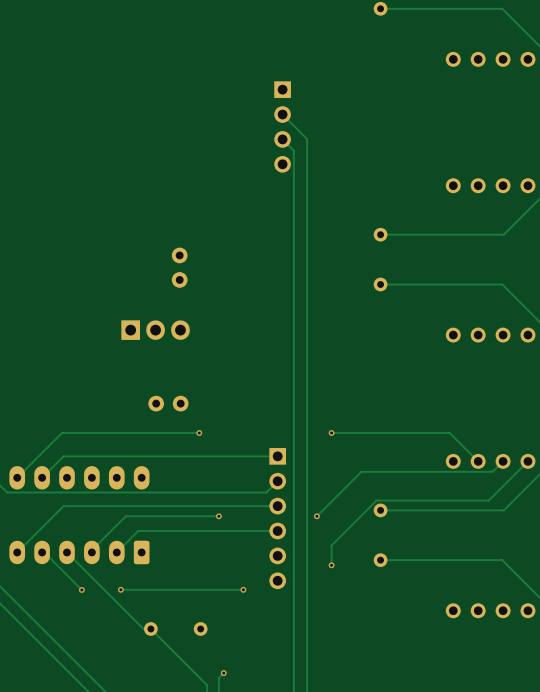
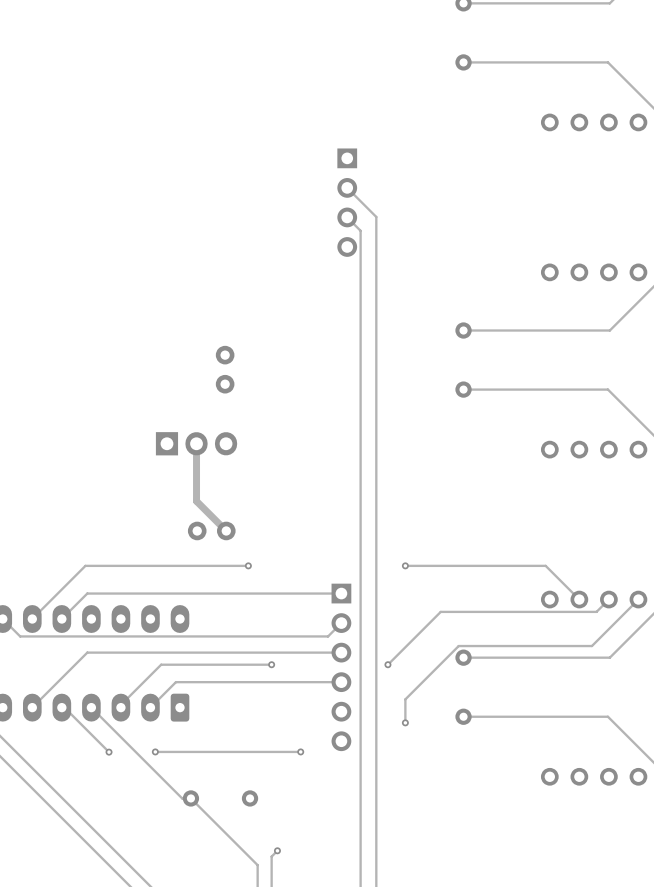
track: none -> (196, 443) (196, 501) (226, 530)

